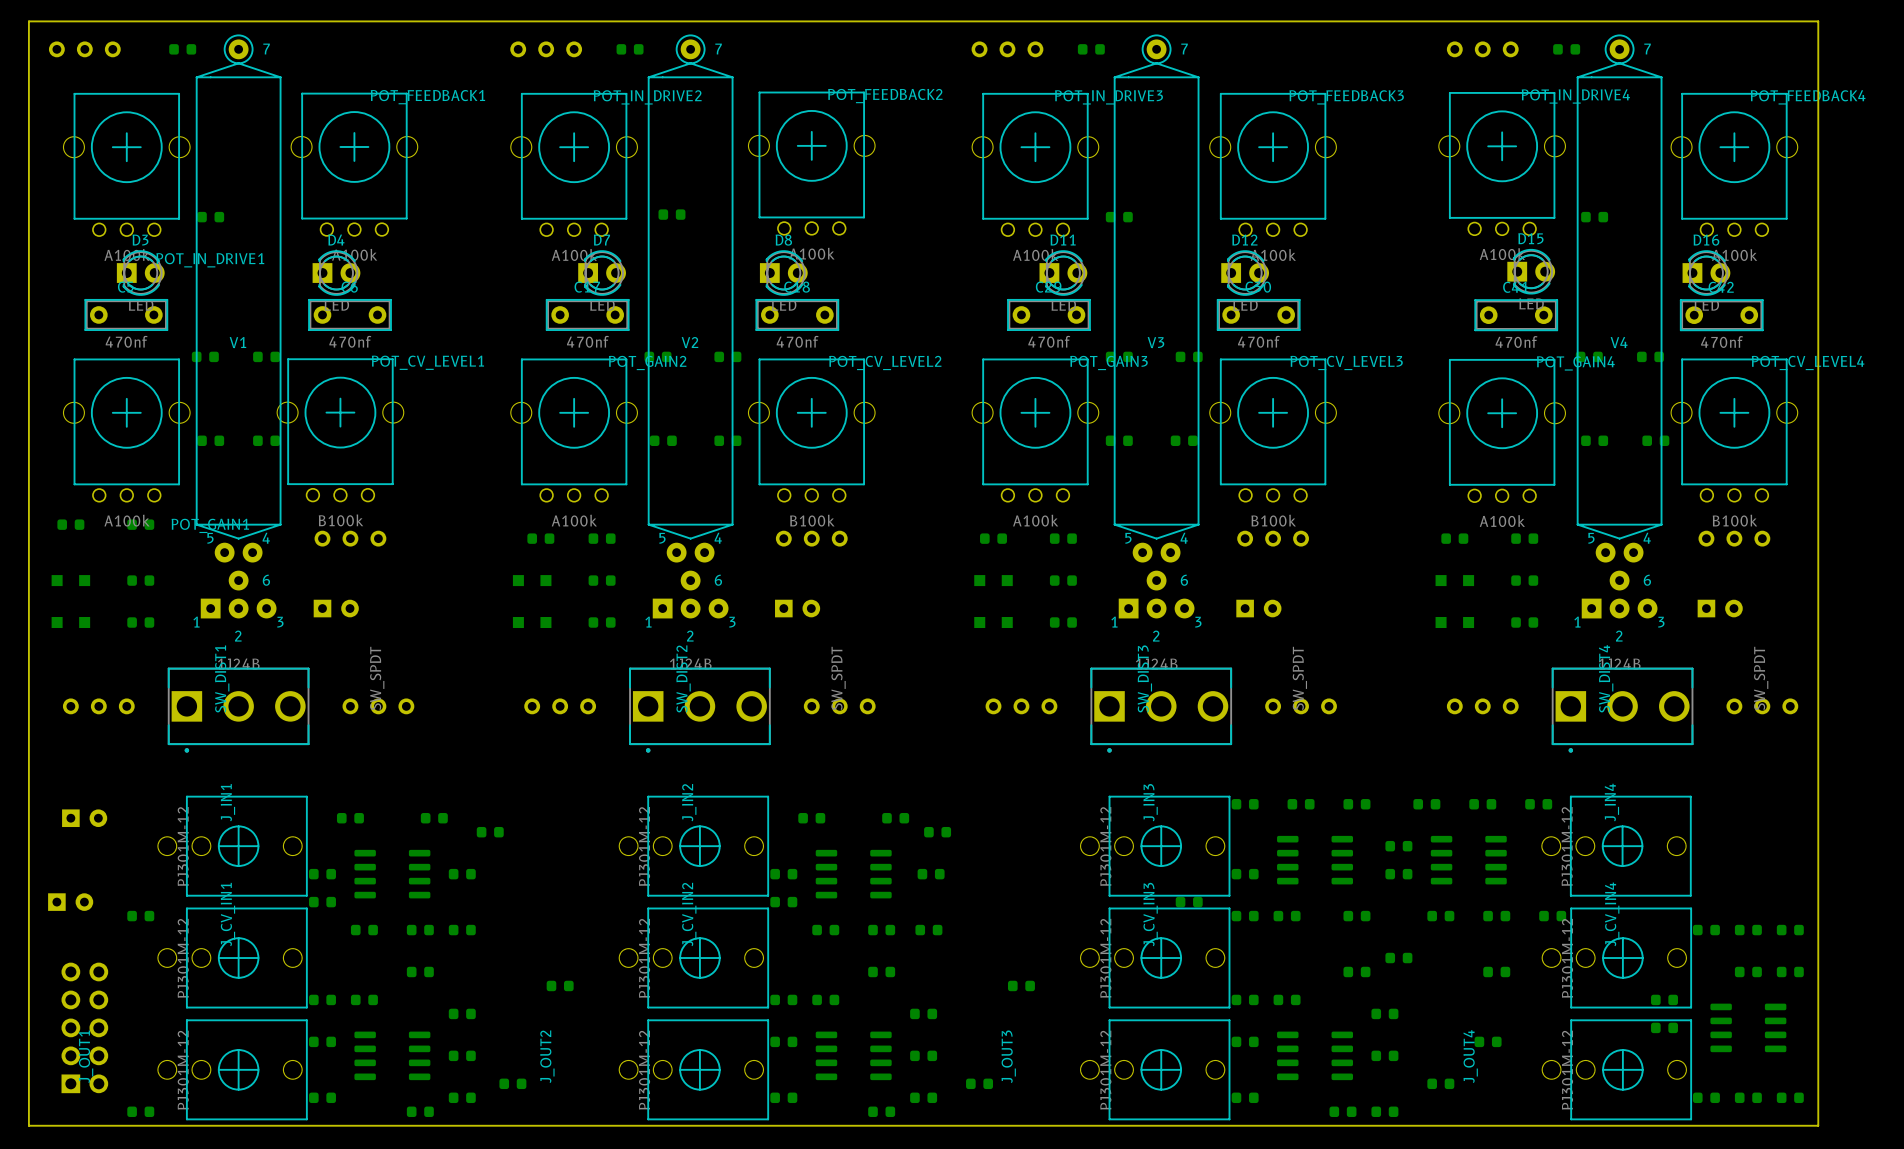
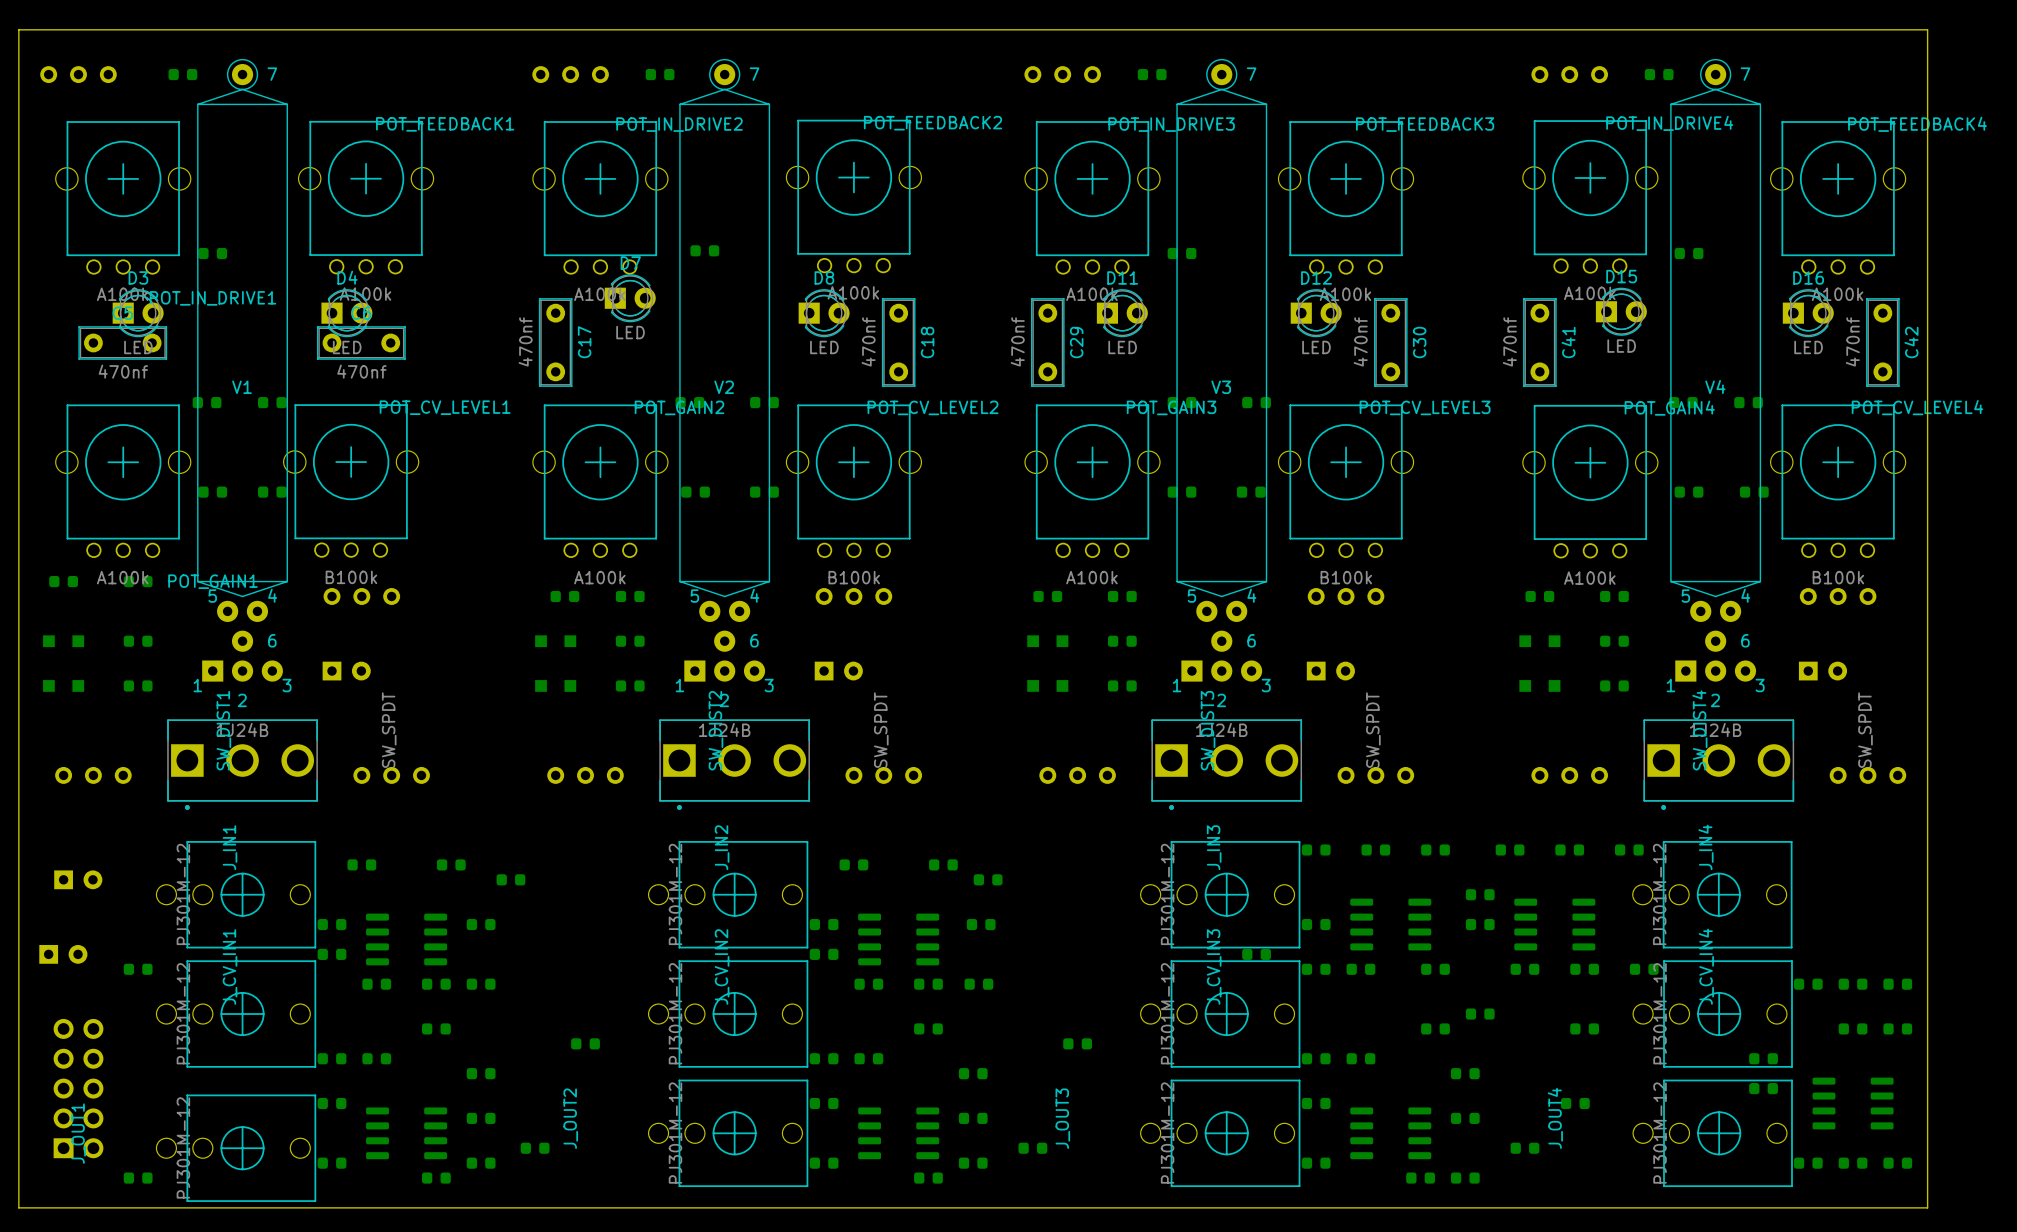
part position: (84, 49) -> (78, 74)
part position: (182, 49) -> (182, 74)
part position: (546, 49) -> (570, 74)
part position: (630, 49) -> (660, 74)
part position: (1007, 49) -> (1062, 74)
part position: (1091, 49) -> (1152, 74)
part position: (1482, 49) -> (1569, 74)
part position: (1566, 49) -> (1659, 74)
POT_FEEDBACK2 position: (811, 163) -> (853, 196)
POT_IN_DRIVE1 position: (126, 164) -> (123, 197)
POT_FEEDBACK1 position: (354, 164) -> (366, 197)
POT_IN_DRIVE2 position: (574, 164) -> (600, 197)
POT_IN_DRIVE3 position: (1035, 164) -> (1092, 197)
POT_FEEDBACK3 position: (1273, 164) -> (1346, 197)
POT_IN_DRIVE4 position: (1502, 164) -> (1590, 196)
POT_FEEDBACK4 position: (1734, 164) -> (1838, 197)
part position: (671, 214) -> (704, 250)
part position: (210, 217) -> (212, 253)
part position: (1119, 217) -> (1182, 253)
part position: (1594, 217) -> (1689, 253)
D15 position: (1531, 271) -> (1621, 311)
D3 position: (140, 273) -> (138, 313)
D4 position: (336, 273) -> (346, 313)
D8 position: (783, 273) -> (824, 313)
D11 position: (1063, 273) -> (1122, 313)
D12 position: (1245, 273) -> (1316, 313)
D16 position: (1706, 273) -> (1808, 313)
C17 rotation: 0° (587, 314) -> 90° clockwise (555, 342)
C17 position: (587, 314) -> (555, 342)
C18 rotation: 0° (797, 314) -> 90° clockwise (898, 342)
C18 position: (797, 314) -> (898, 342)
C29 rotation: 0° (1048, 314) -> 90° clockwise (1047, 342)
C29 position: (1048, 314) -> (1047, 342)
C30 rotation: 0° (1258, 314) -> 90° clockwise (1390, 342)
C30 position: (1258, 314) -> (1390, 342)
C41 rotation: 0° (1516, 315) -> 90° clockwise (1539, 342)
C41 position: (1516, 315) -> (1539, 342)
C42 rotation: 0° (1721, 315) -> 90° clockwise (1882, 342)
C42 position: (1721, 315) -> (1882, 342)
V1 position: (238, 326) -> (242, 370)
V2 position: (690, 326) -> (724, 370)
V3 position: (1156, 326) -> (1221, 370)
V4 position: (1619, 326) -> (1715, 370)
part position: (205, 356) -> (207, 402)
part position: (266, 356) -> (272, 402)
part position: (658, 356) -> (689, 402)
part position: (727, 356) -> (764, 402)
part position: (1119, 356) -> (1182, 402)
part position: (1189, 356) -> (1256, 402)
part position: (1589, 356) -> (1683, 402)
part position: (1650, 356) -> (1748, 402)
POT_GAIN1 position: (126, 430) -> (123, 481)
POT_CV_LEVEL1 position: (340, 430) -> (351, 480)
POT_GAIN2 position: (574, 430) -> (600, 481)
POT_CV_LEVEL2 position: (811, 430) -> (853, 481)
POT_GAIN3 position: (1035, 430) -> (1092, 481)
POT_CV_LEVEL3 position: (1273, 430) -> (1346, 481)
POT_CV_LEVEL4 position: (1734, 430) -> (1838, 481)
POT_GAIN4 position: (1502, 431) -> (1590, 481)
part position: (210, 440) -> (212, 492)
part position: (266, 440) -> (272, 492)
part position: (663, 440) -> (695, 492)
part position: (727, 440) -> (764, 492)
part position: (1119, 440) -> (1182, 492)
part position: (1184, 440) -> (1251, 492)
part position: (1594, 440) -> (1689, 492)
part position: (1655, 440) -> (1754, 492)
part position: (70, 524) -> (63, 581)
part position: (140, 524) -> (138, 581)
part position: (350, 538) -> (361, 596)
part position: (540, 538) -> (564, 596)
part: (602, 538) -> none
part position: (811, 538) -> (853, 596)
part position: (993, 538) -> (1047, 596)
part: (1063, 538) -> none
part position: (1273, 538) -> (1346, 596)
part position: (1454, 538) -> (1539, 596)
part: (1524, 538) -> none
part position: (1734, 538) -> (1838, 596)
part: none -> (630, 596)
part: none -> (1122, 596)
part: none -> (1614, 596)
part: (70, 580) -> none
part: (140, 580) -> none
part: (532, 580) -> none
part: (602, 580) -> none
part: (993, 580) -> none
part: (1063, 580) -> none
part: (1454, 580) -> none
part: (1524, 580) -> none
part: none -> (63, 641)
part: none -> (138, 641)
part: none -> (555, 641)
part: none -> (630, 641)
part: none -> (1047, 641)
part: none -> (1122, 641)
part: none -> (1539, 641)
part: none -> (1614, 641)
part position: (336, 608) -> (346, 671)
part position: (797, 608) -> (838, 671)
part position: (1258, 608) -> (1330, 671)
part position: (1720, 608) -> (1822, 671)
part: (70, 622) -> none
part: (140, 622) -> none
part: (532, 622) -> none
part: (602, 622) -> none
part: (993, 622) -> none
part: (1063, 622) -> none
part: (1454, 622) -> none
part: (1524, 622) -> none
part: none -> (63, 685)
part: none -> (138, 685)
part: none -> (555, 685)
part: none -> (630, 685)
part: none -> (1047, 685)
part: none -> (1122, 685)
part: none -> (1539, 685)
part: none -> (1614, 685)
part position: (98, 706) -> (93, 775)
part position: (378, 706) -> (391, 775)
part position: (560, 706) -> (585, 775)
part position: (839, 706) -> (883, 775)
part position: (1021, 706) -> (1077, 775)
part position: (1301, 706) -> (1375, 775)
part position: (1482, 706) -> (1569, 775)
part position: (1762, 706) -> (1867, 775)
part position: (1245, 804) -> (1316, 849)
part position: (1301, 804) -> (1375, 849)
part position: (1356, 804) -> (1435, 849)
part position: (1426, 804) -> (1510, 849)
part position: (1482, 804) -> (1569, 849)
part position: (1538, 804) -> (1629, 849)
part position: (350, 818) -> (361, 864)
part position: (434, 818) -> (451, 864)
part position: (811, 818) -> (853, 864)
part position: (895, 818) -> (943, 864)
part position: (490, 832) -> (510, 879)
part position: (937, 832) -> (988, 879)
part: none -> (1480, 894)
J_IN1 position: (232, 846) -> (236, 894)
J_IN2 position: (693, 846) -> (728, 894)
J_IN3 position: (1155, 846) -> (1220, 894)
part: (1398, 846) -> none
J_IN4 position: (1616, 846) -> (1712, 894)
part: none -> (332, 924)
part: none -> (824, 924)
part: none -> (1316, 924)
part: none -> (1480, 924)
part: (322, 874) -> none
part position: (462, 874) -> (481, 924)
part: (783, 874) -> none
part position: (931, 874) -> (981, 924)
part: (1245, 874) -> none
part: (1398, 874) -> none
part: none -> (332, 954)
part: none -> (824, 954)
part position: (70, 902) -> (63, 954)
part: (322, 902) -> none
part: (783, 902) -> none
part position: (1189, 902) -> (1256, 954)
part: none -> (1316, 969)
part position: (140, 916) -> (138, 969)
part: none -> (436, 984)
part: none -> (928, 984)
part: (1245, 916) -> none
part position: (1287, 916) -> (1360, 969)
part position: (1356, 916) -> (1435, 969)
part position: (1440, 916) -> (1524, 969)
part position: (1496, 916) -> (1584, 969)
part position: (1552, 916) -> (1644, 969)
part: none -> (1853, 984)
part: none -> (1897, 984)
part position: (364, 930) -> (376, 984)
part: (420, 930) -> none
part position: (462, 930) -> (481, 984)
part position: (825, 930) -> (868, 984)
part: (881, 930) -> none
part position: (928, 930) -> (978, 984)
part position: (1706, 930) -> (1808, 984)
part: (1748, 930) -> none
part: (1790, 930) -> none
J_CV_IN1 position: (232, 958) -> (236, 1014)
part: none -> (436, 1028)
J_CV_IN2 position: (693, 958) -> (728, 1014)
part: none -> (928, 1028)
J_CV_IN3 position: (1155, 958) -> (1220, 1014)
part position: (1398, 958) -> (1480, 1014)
J_CV_IN4 position: (1616, 958) -> (1712, 1014)
part: none -> (1853, 1028)
part: none -> (1897, 1028)
part: (420, 971) -> none
part: (881, 971) -> none
part position: (1356, 971) -> (1435, 1028)
part position: (1496, 971) -> (1584, 1028)
part: (1748, 971) -> none
part: (1790, 971) -> none
part: none -> (332, 1058)
part position: (560, 985) -> (585, 1043)
part: none -> (824, 1058)
part position: (1021, 985) -> (1077, 1043)
part: none -> (1316, 1058)
part: none -> (1763, 1058)
part: (322, 999) -> none
part position: (364, 999) -> (376, 1058)
part: none -> (481, 1073)
part: (783, 999) -> none
part position: (825, 999) -> (868, 1058)
part: none -> (973, 1073)
part: (1245, 999) -> none
part position: (1287, 999) -> (1360, 1058)
part: none -> (1465, 1073)
part: (1664, 999) -> none
part: (462, 1013) -> none
part: (923, 1013) -> none
part: (1384, 1013) -> none
part: none -> (1763, 1088)
part position: (84, 1027) -> (78, 1088)
part: none -> (332, 1103)
part: none -> (824, 1103)
part: none -> (1316, 1103)
part: (1664, 1027) -> none
part: (322, 1041) -> none
part: none -> (481, 1118)
part: (783, 1041) -> none
part: none -> (973, 1118)
part: (1245, 1041) -> none
part: none -> (1465, 1118)
part position: (1488, 1041) -> (1575, 1103)
part: (462, 1055) -> none
part: (923, 1055) -> none
part: (1384, 1055) -> none
J_OUT2 position: (693, 1069) -> (728, 1133)
J_OUT3 position: (1155, 1069) -> (1220, 1133)
J_OUT4 position: (1616, 1069) -> (1712, 1133)
part: none -> (481, 1163)
part position: (512, 1083) -> (535, 1148)
part: none -> (973, 1163)
part position: (979, 1083) -> (1032, 1148)
part position: (1440, 1083) -> (1524, 1148)
part position: (322, 1097) -> (332, 1163)
part: (462, 1097) -> none
part position: (783, 1097) -> (824, 1163)
part: (923, 1097) -> none
part position: (1245, 1097) -> (1316, 1163)
part position: (1706, 1097) -> (1808, 1163)
part position: (1748, 1097) -> (1853, 1163)
part position: (1790, 1097) -> (1897, 1163)
part position: (140, 1111) -> (138, 1178)
part position: (420, 1111) -> (436, 1178)
part position: (881, 1111) -> (928, 1178)
part position: (1342, 1111) -> (1420, 1178)
part position: (1384, 1111) -> (1465, 1178)

